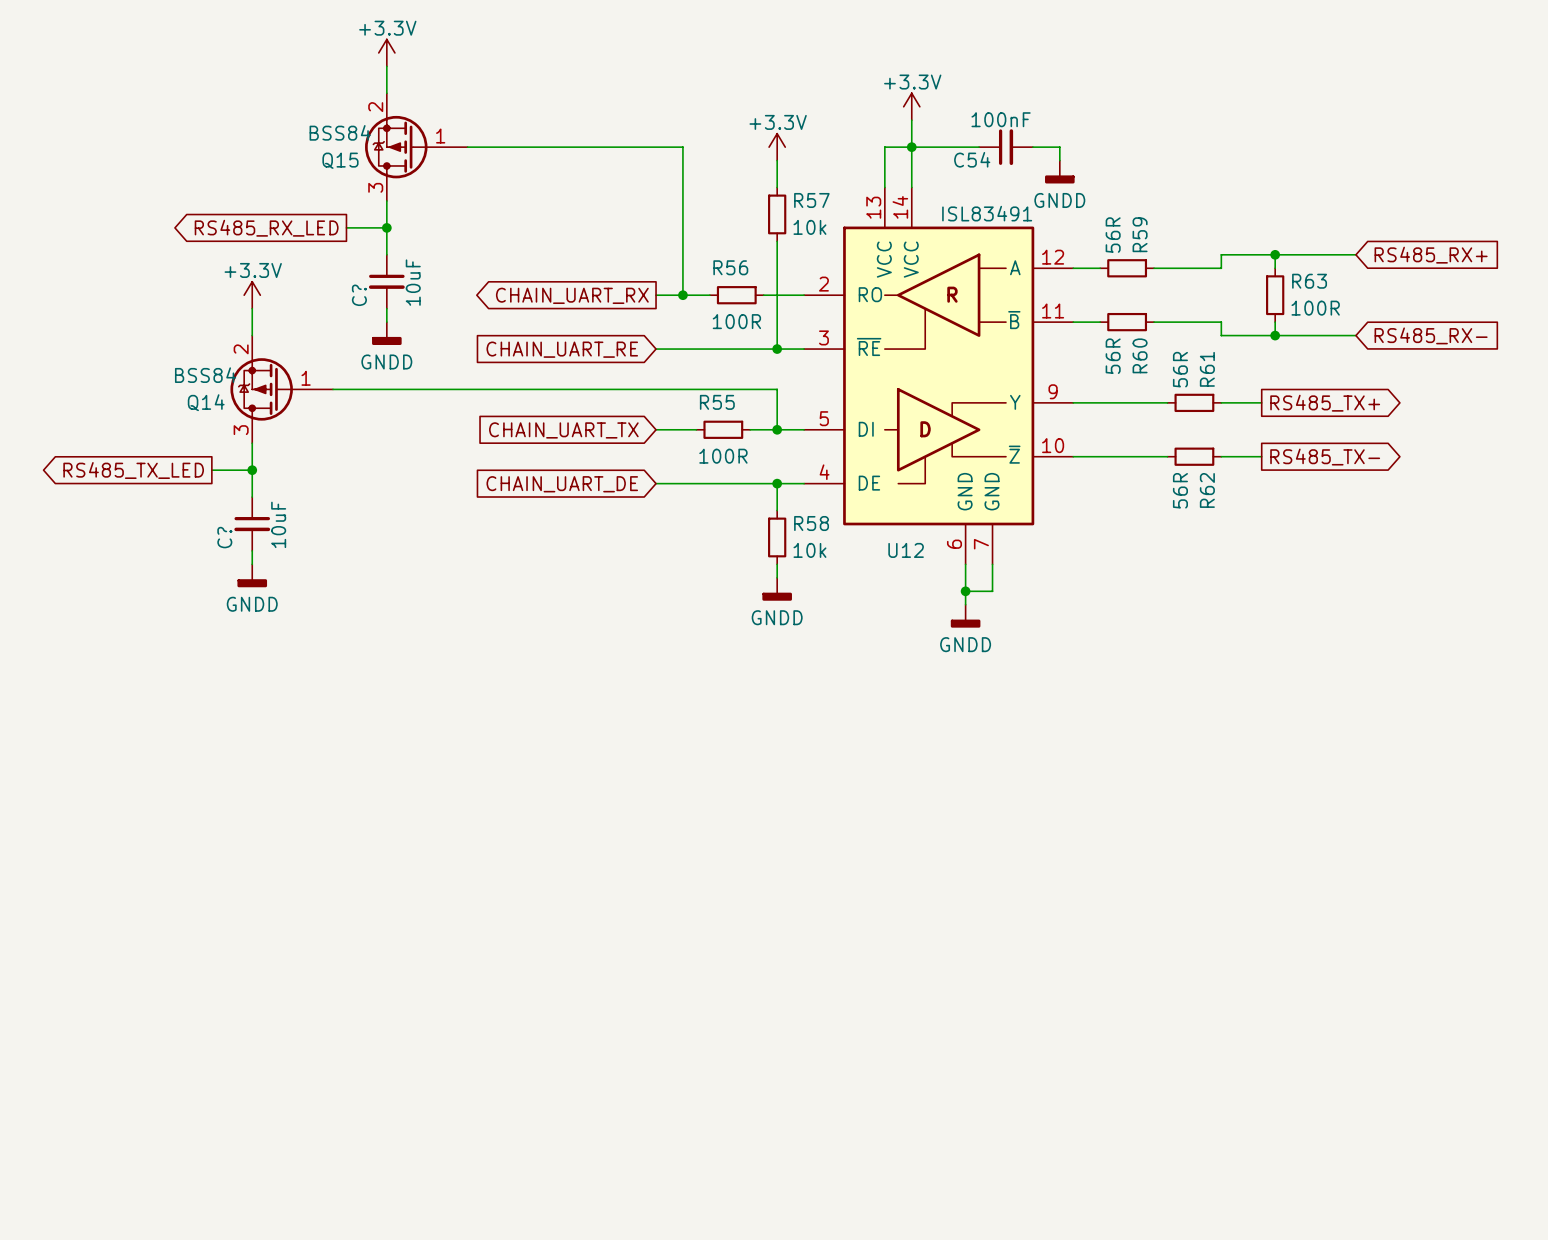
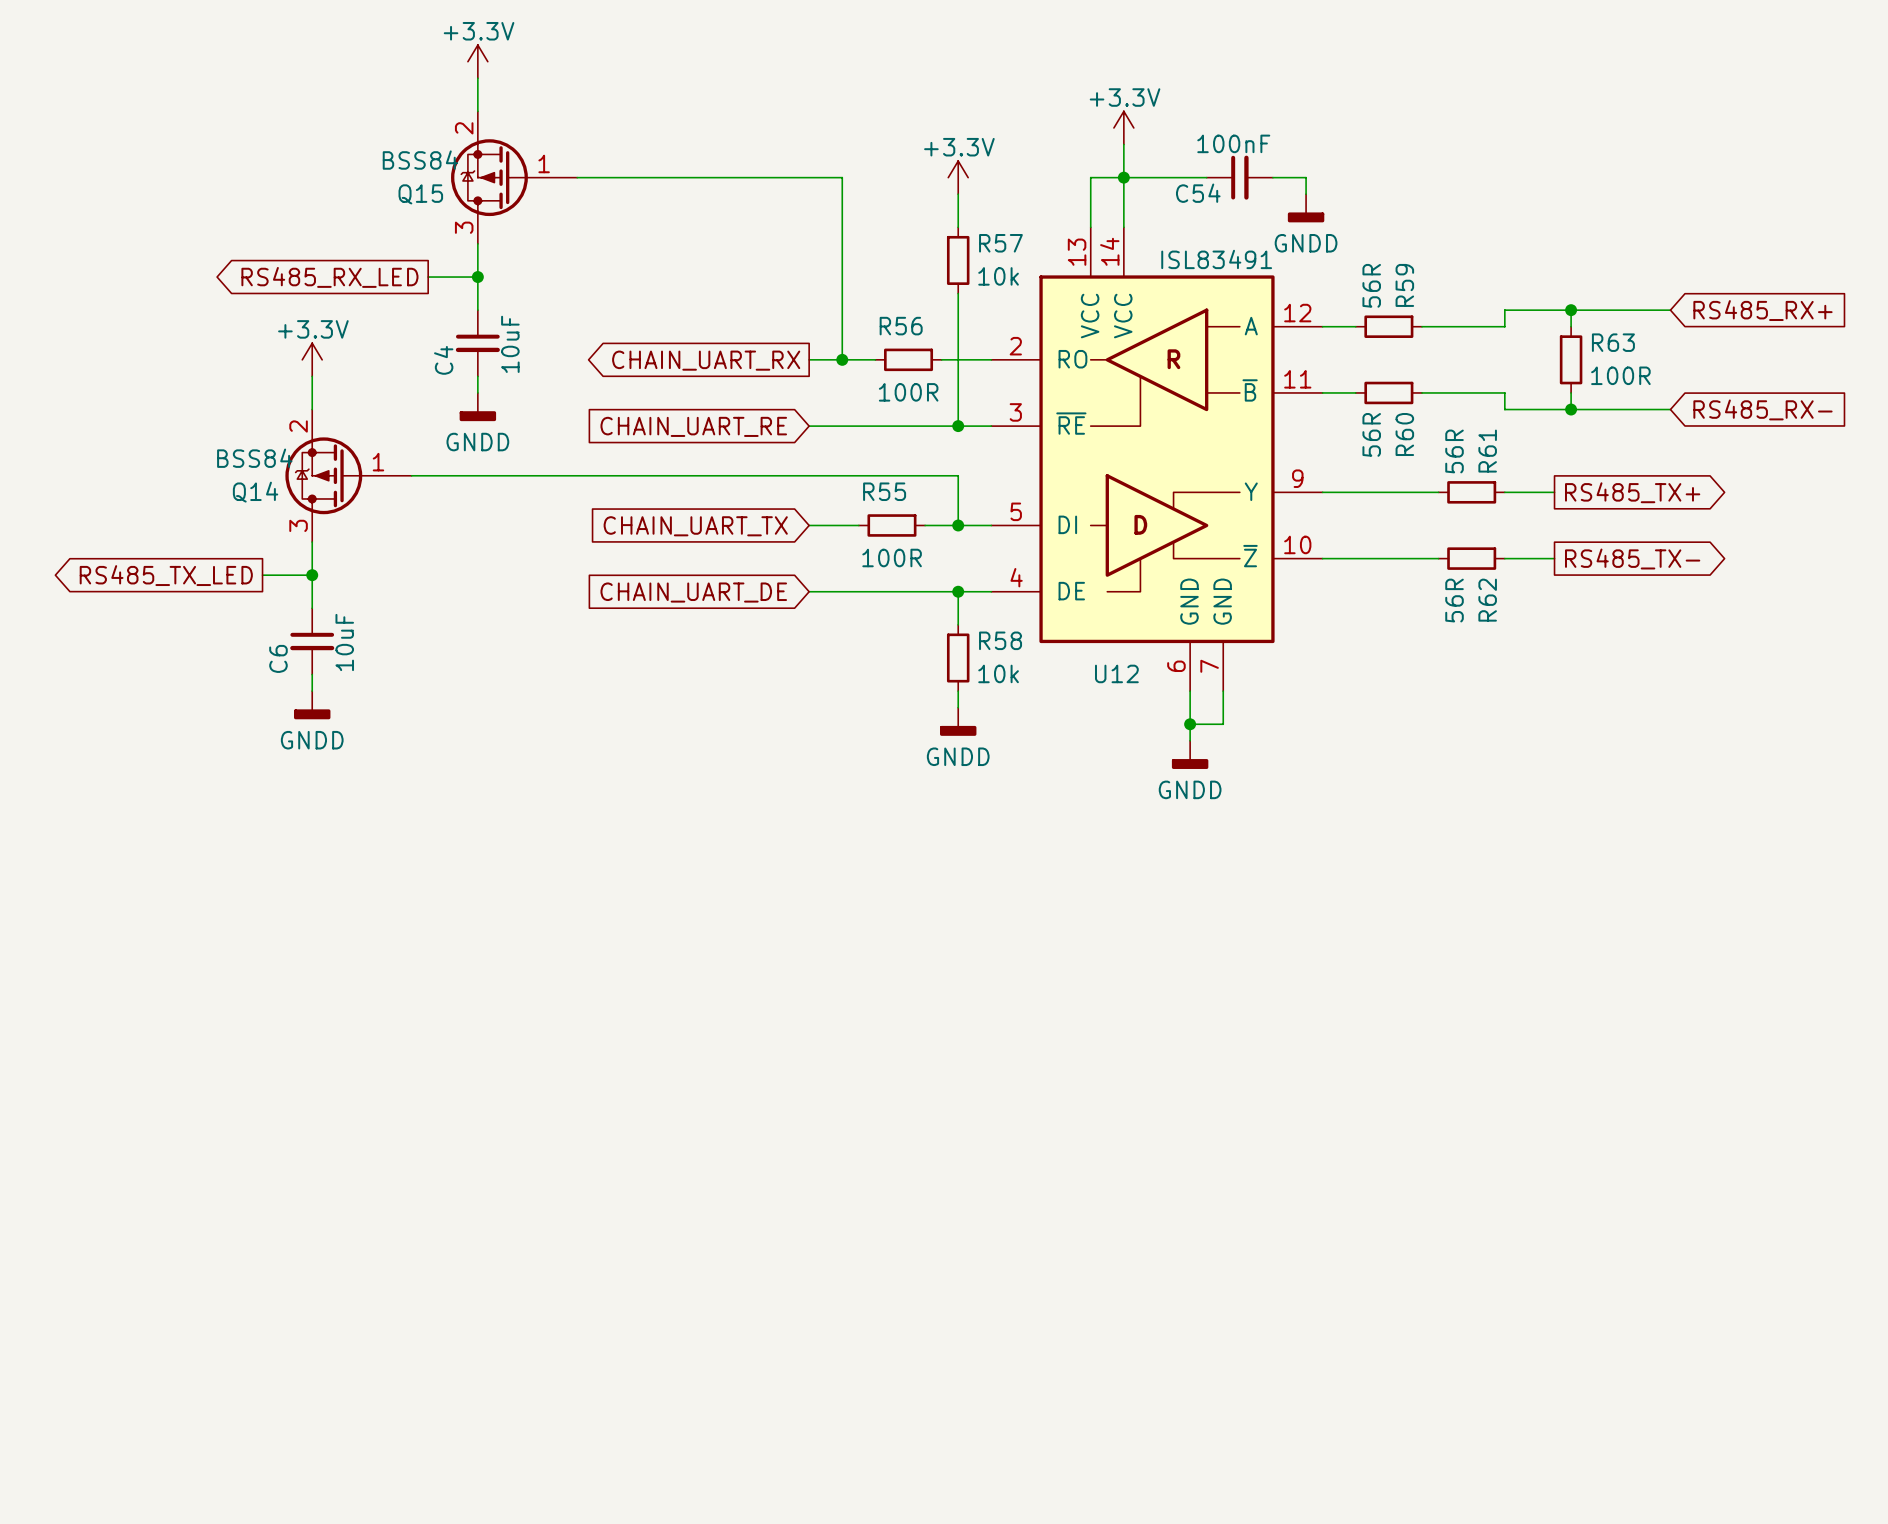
C? name: C? (359, 295) -> C4 (443, 360)
C? name: C? (224, 537) -> C6 (278, 658)

